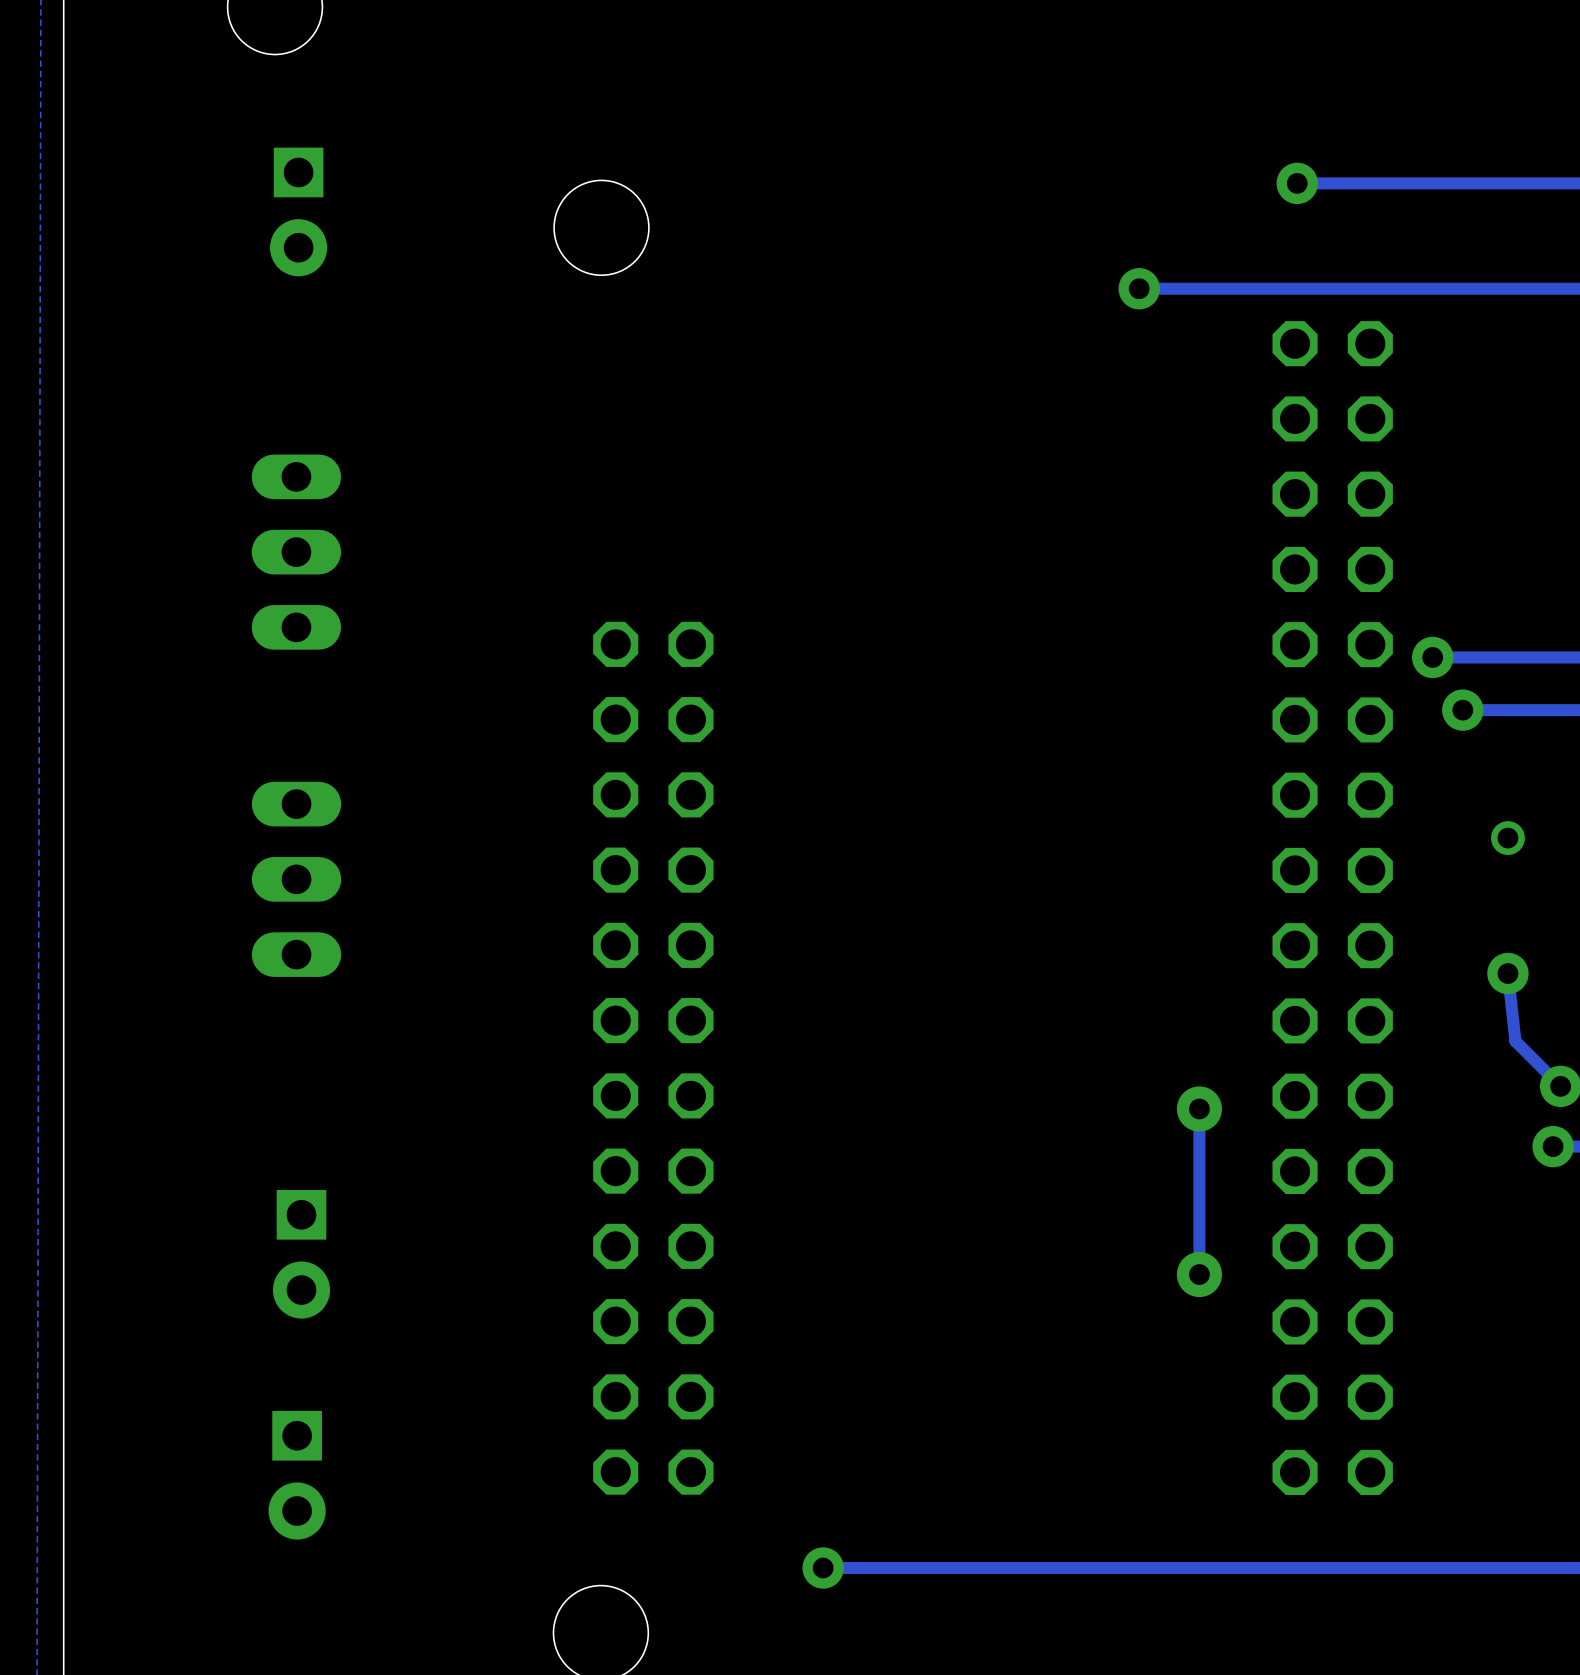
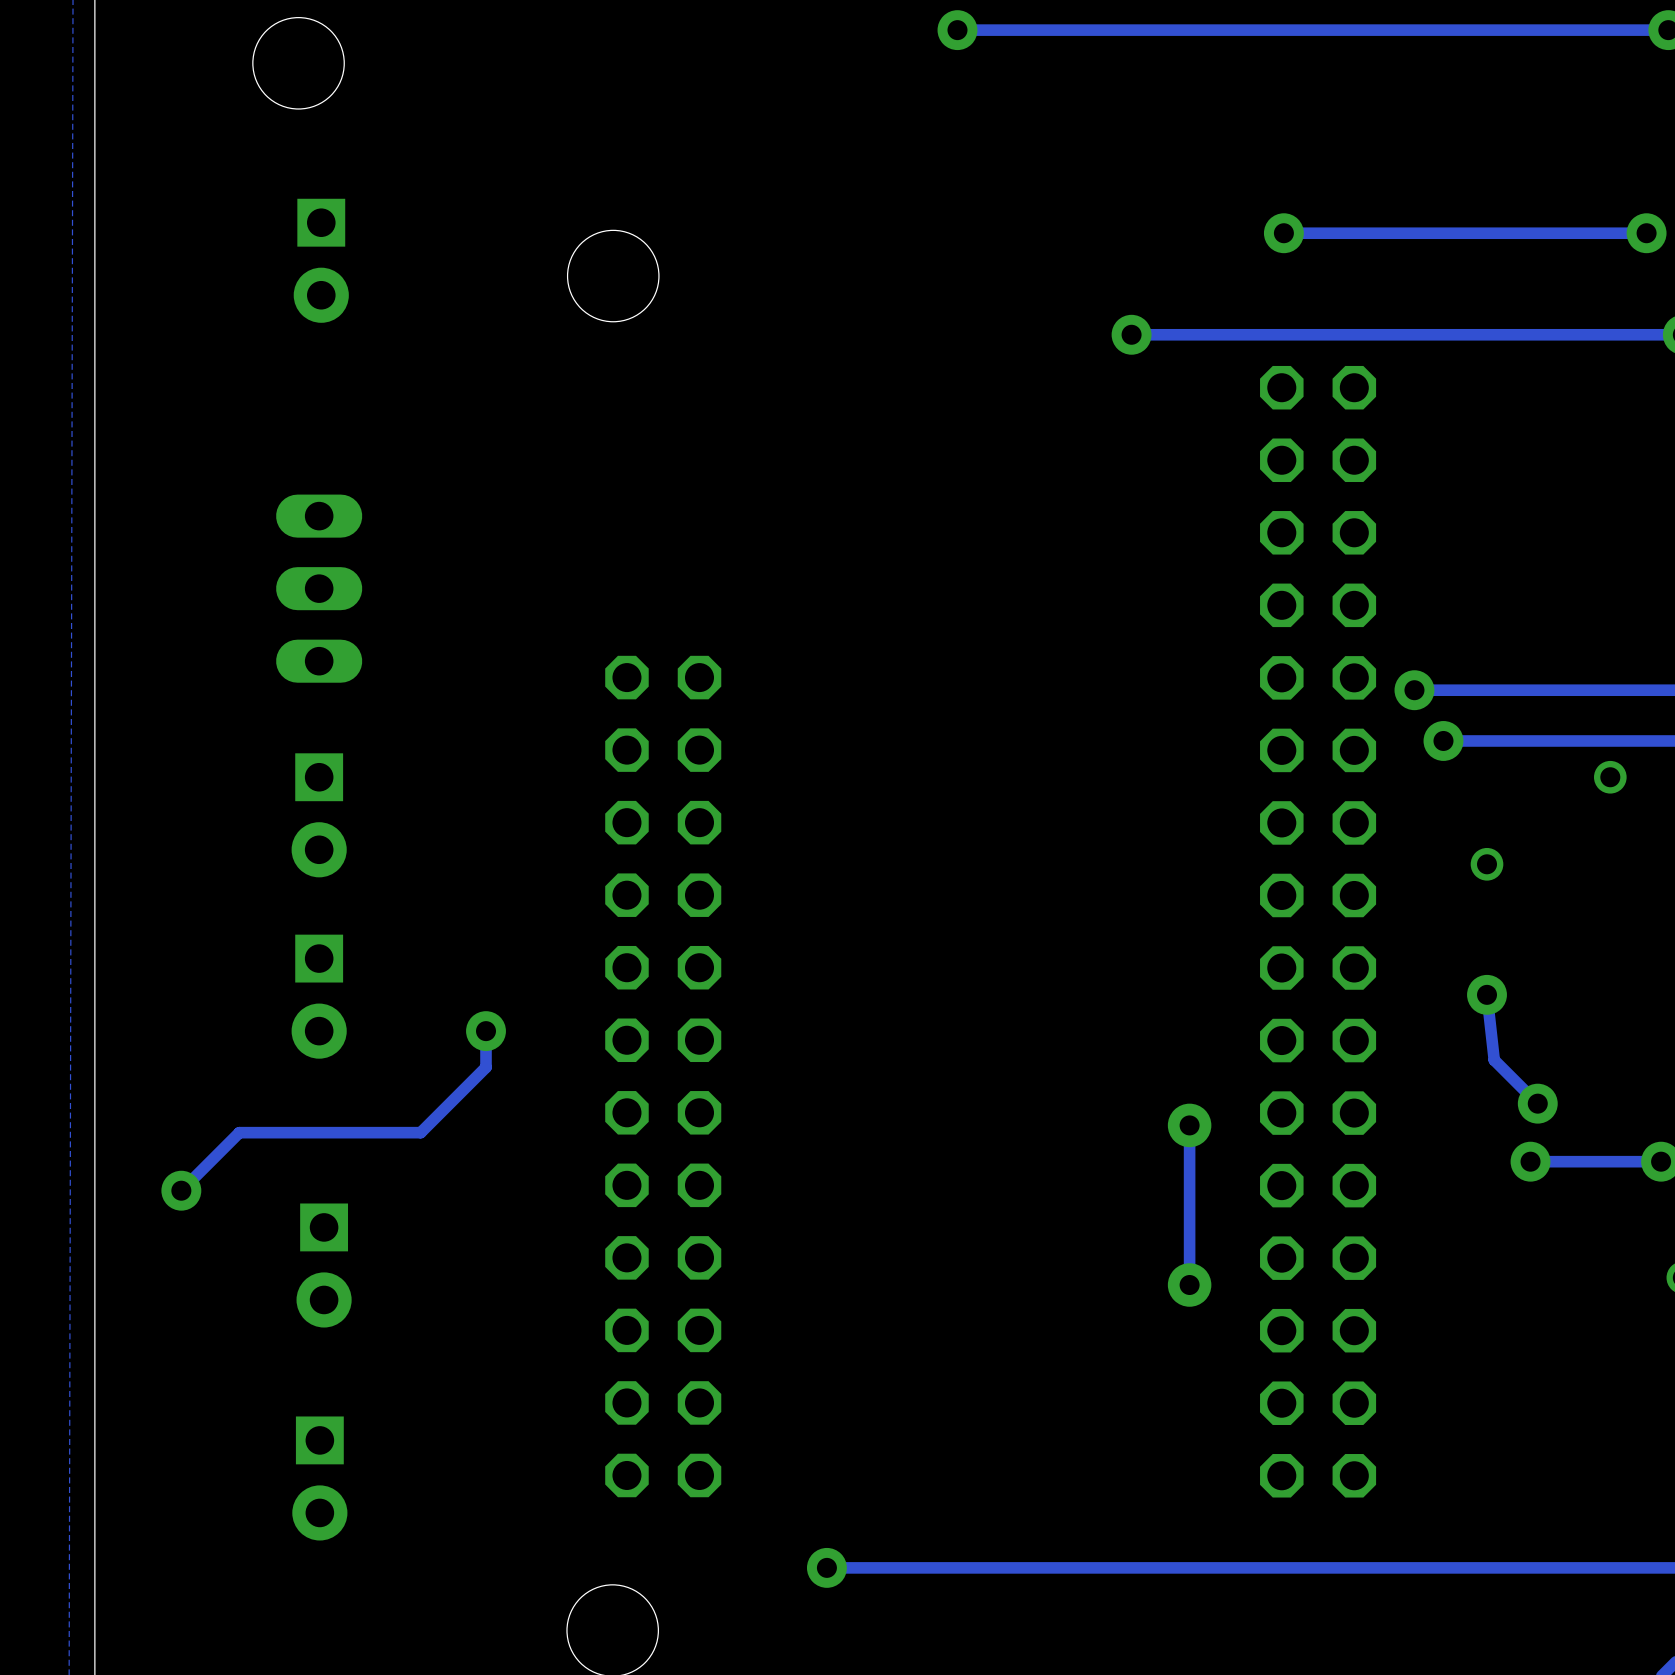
part: none -> (319, 815)
part: (296, 879) -> none
part: none -> (319, 996)
track: none -> (486, 1031) (486, 1067) (420, 1132) (239, 1132) (181, 1190)
via: none -> (486, 1031)
via: none -> (181, 1190)

